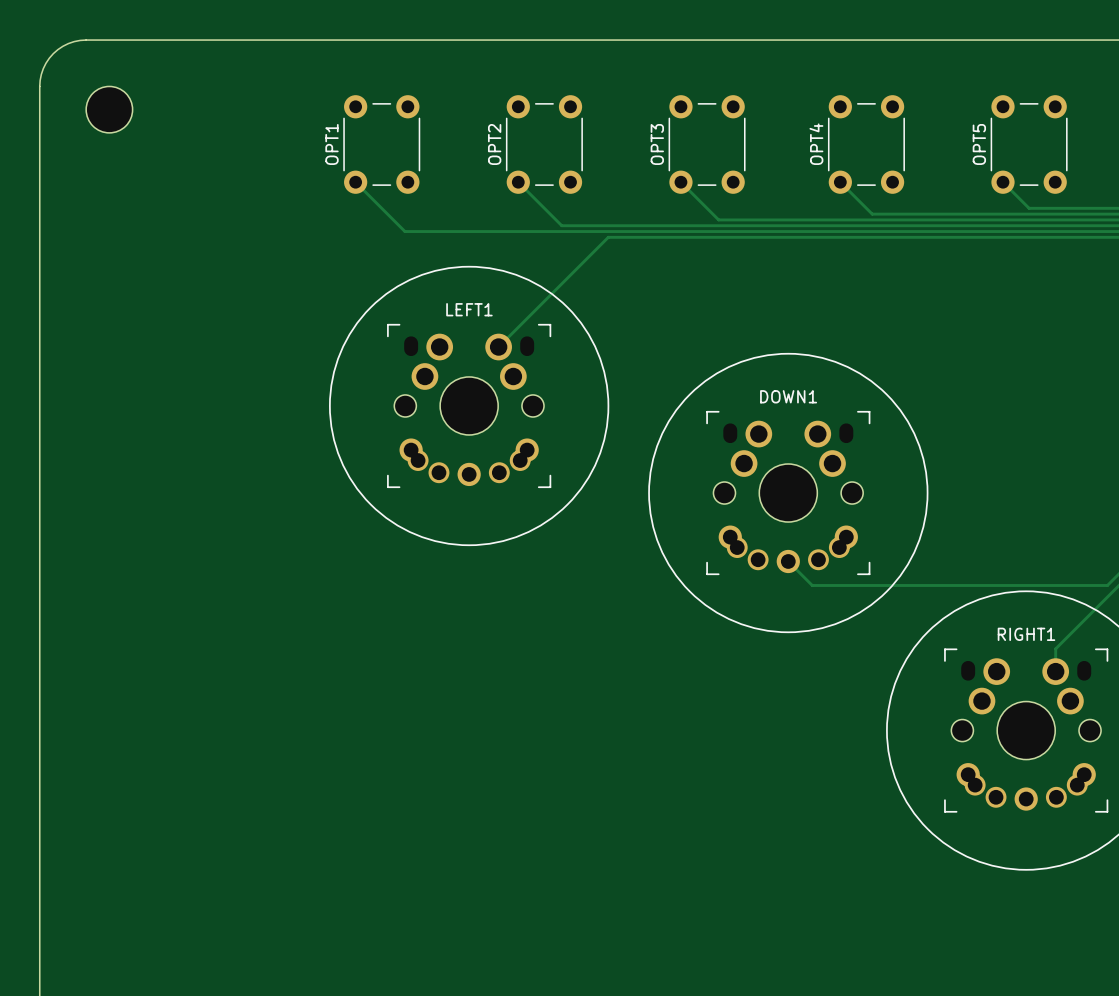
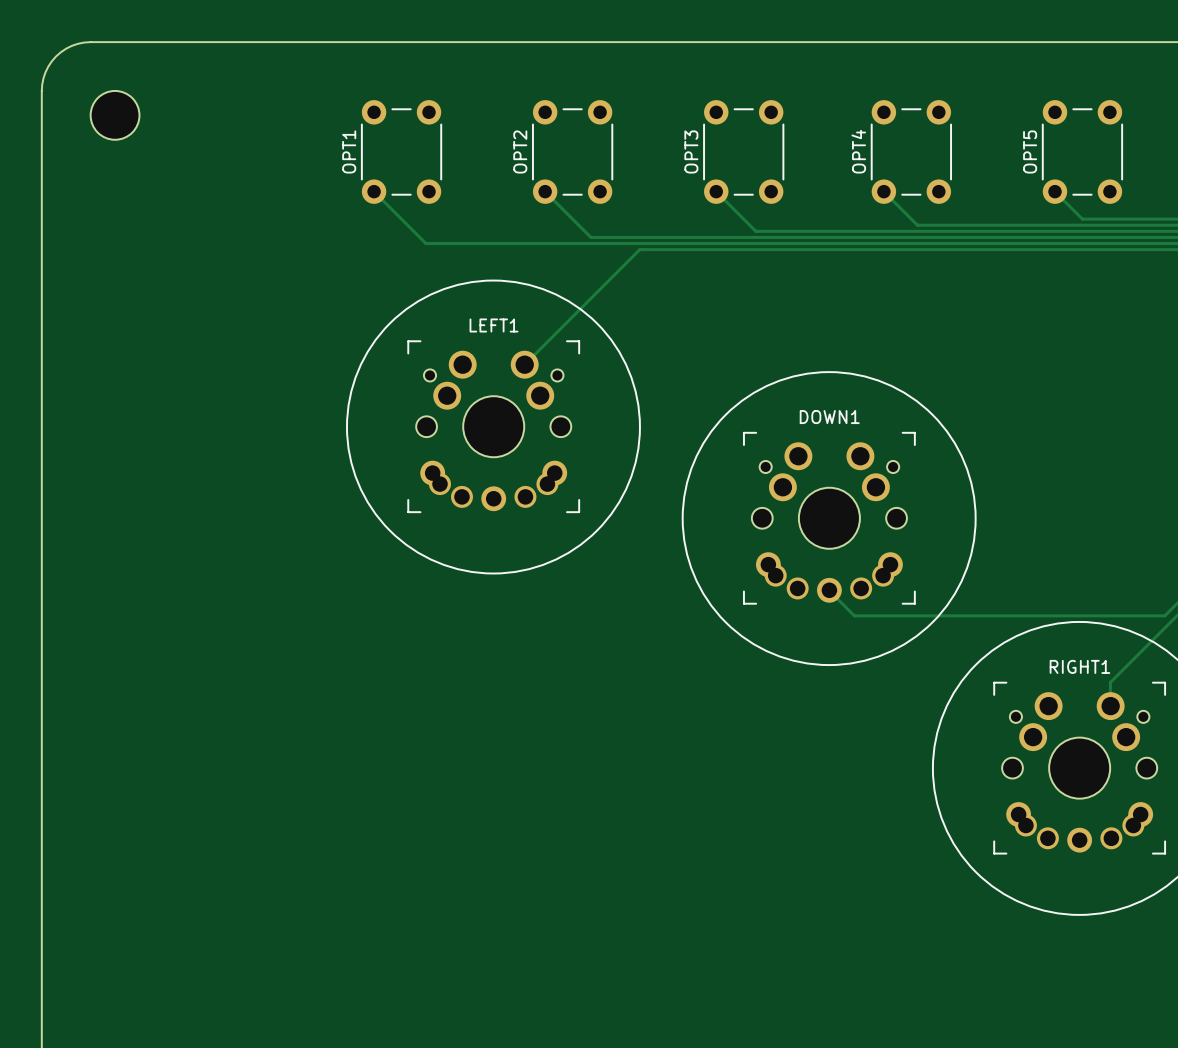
LEFT1 footprint: [387, 323, 552, 489] -> [407, 340, 581, 514]
DOWN1 footprint: [706, 410, 871, 576] -> [743, 431, 916, 605]
RIGHT1 footprint: [944, 648, 1109, 813] -> [993, 681, 1167, 855]

